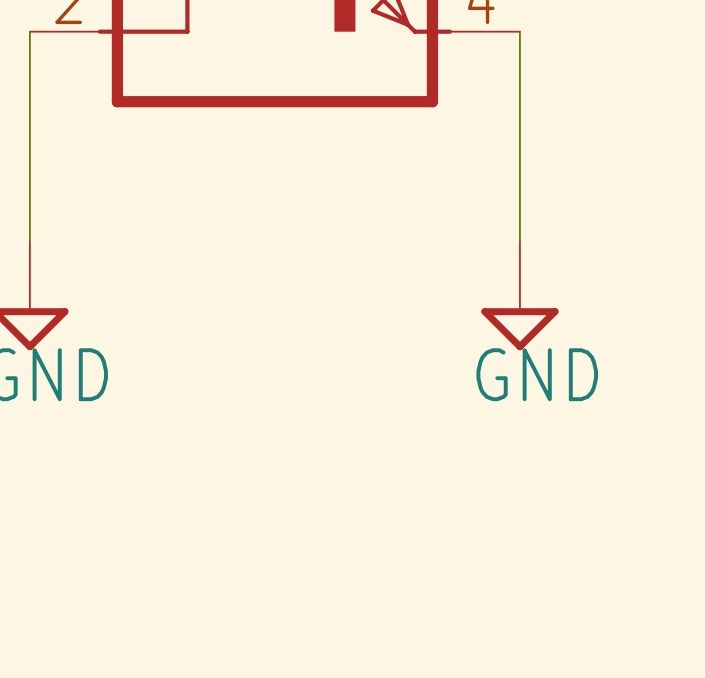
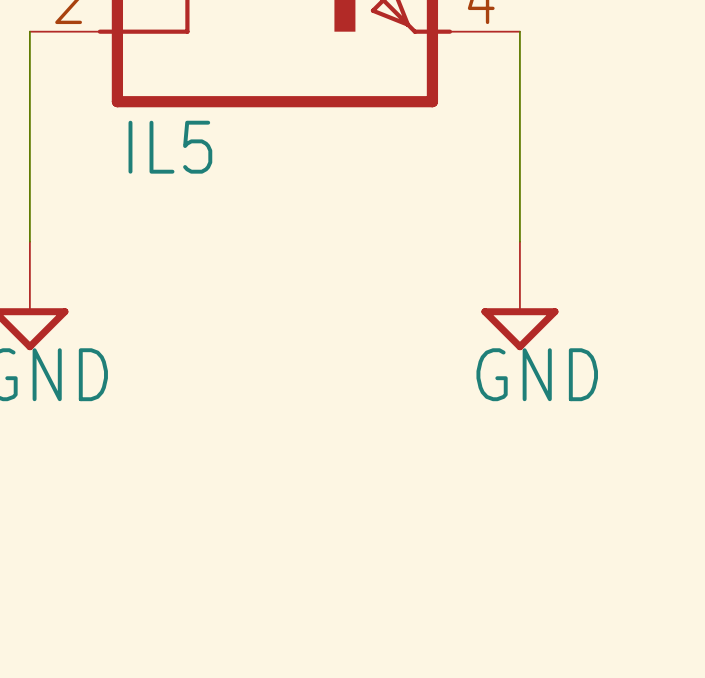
part value: none -> IL5 (170, 147)

